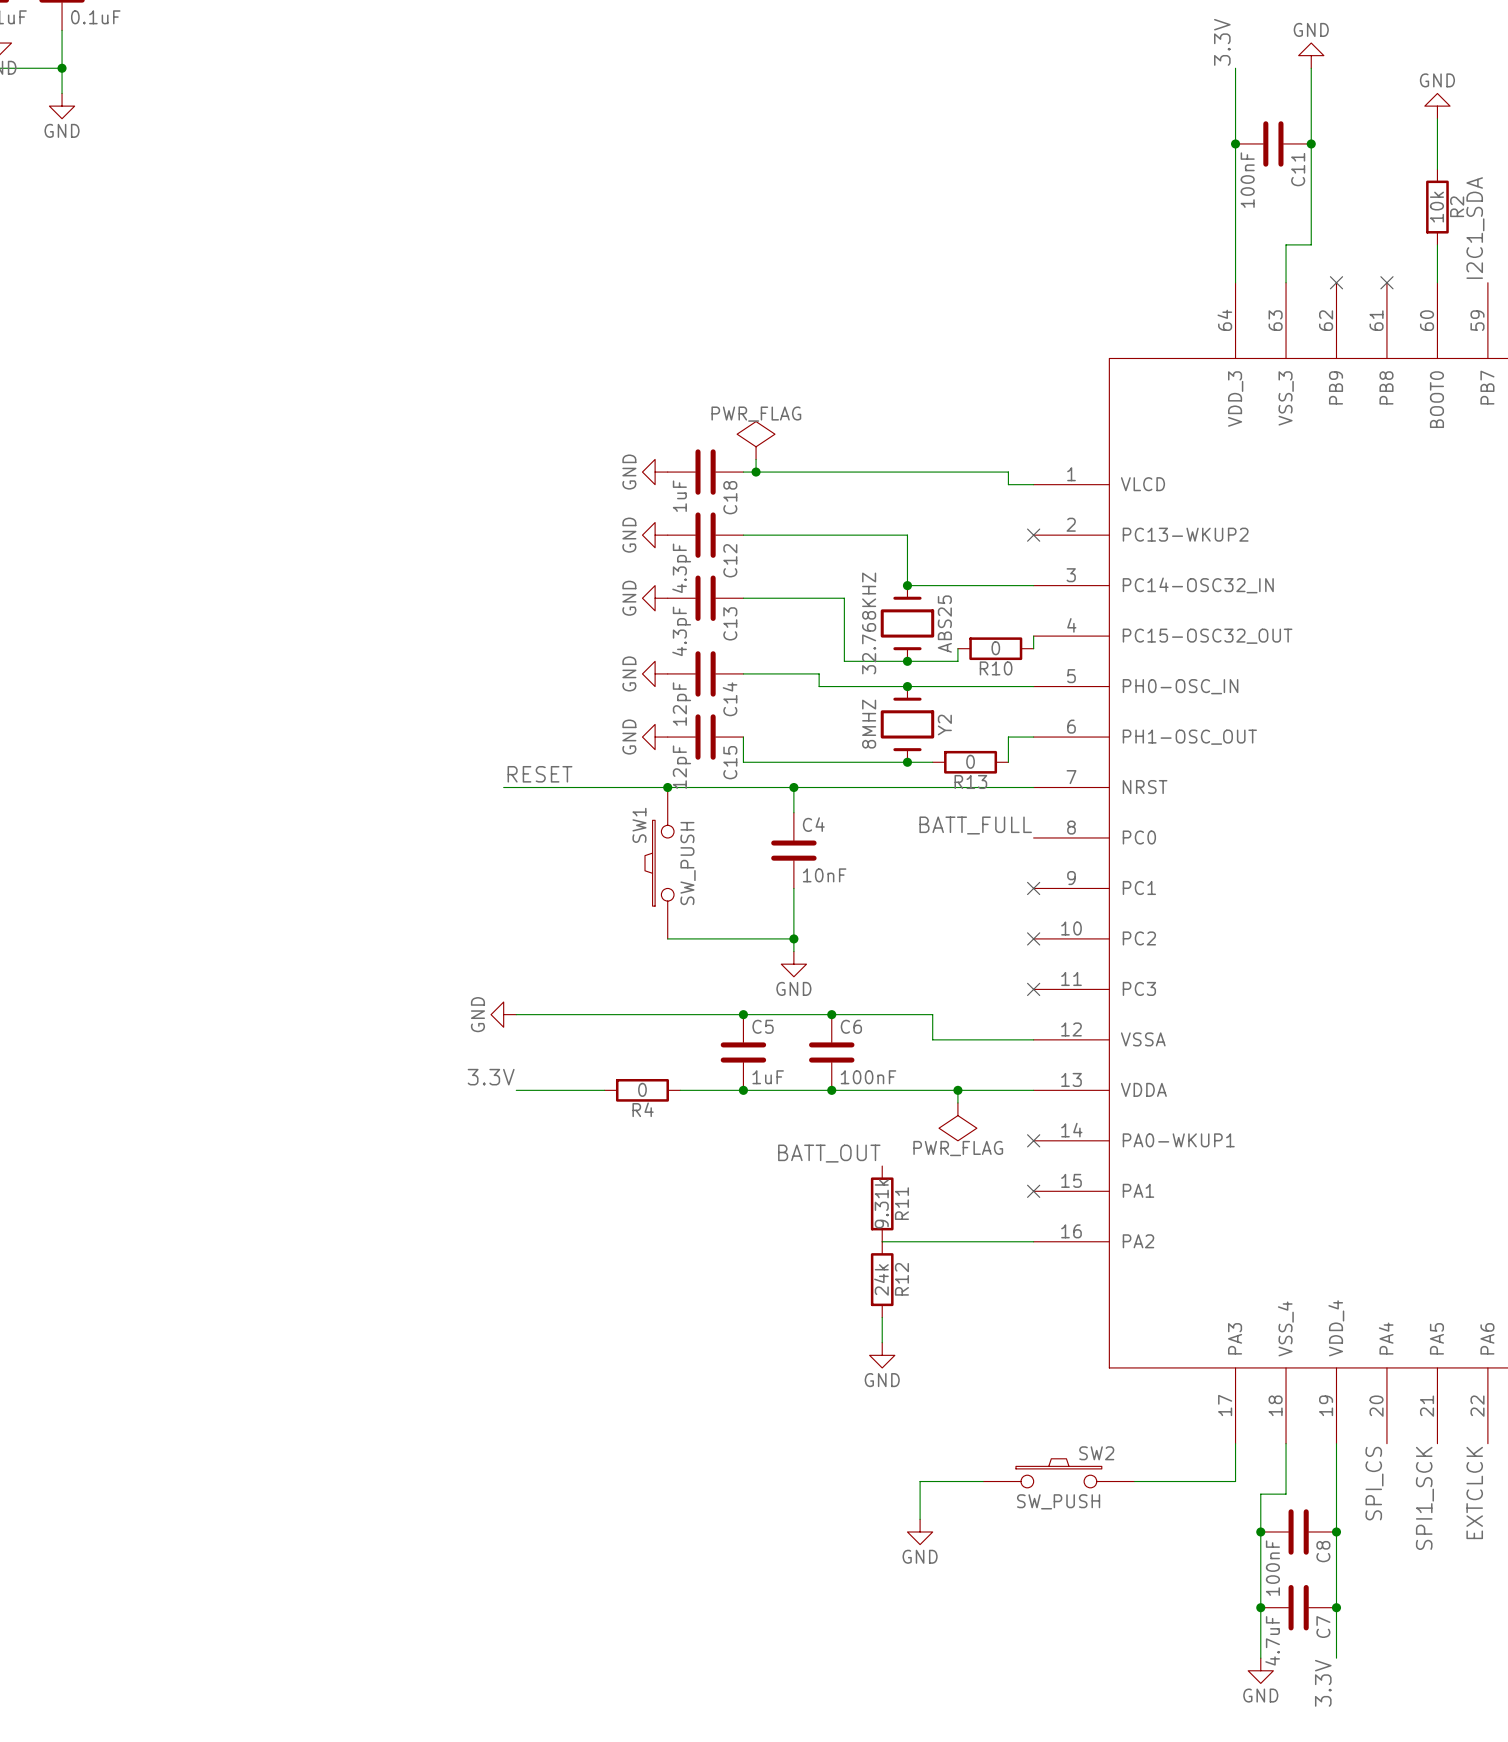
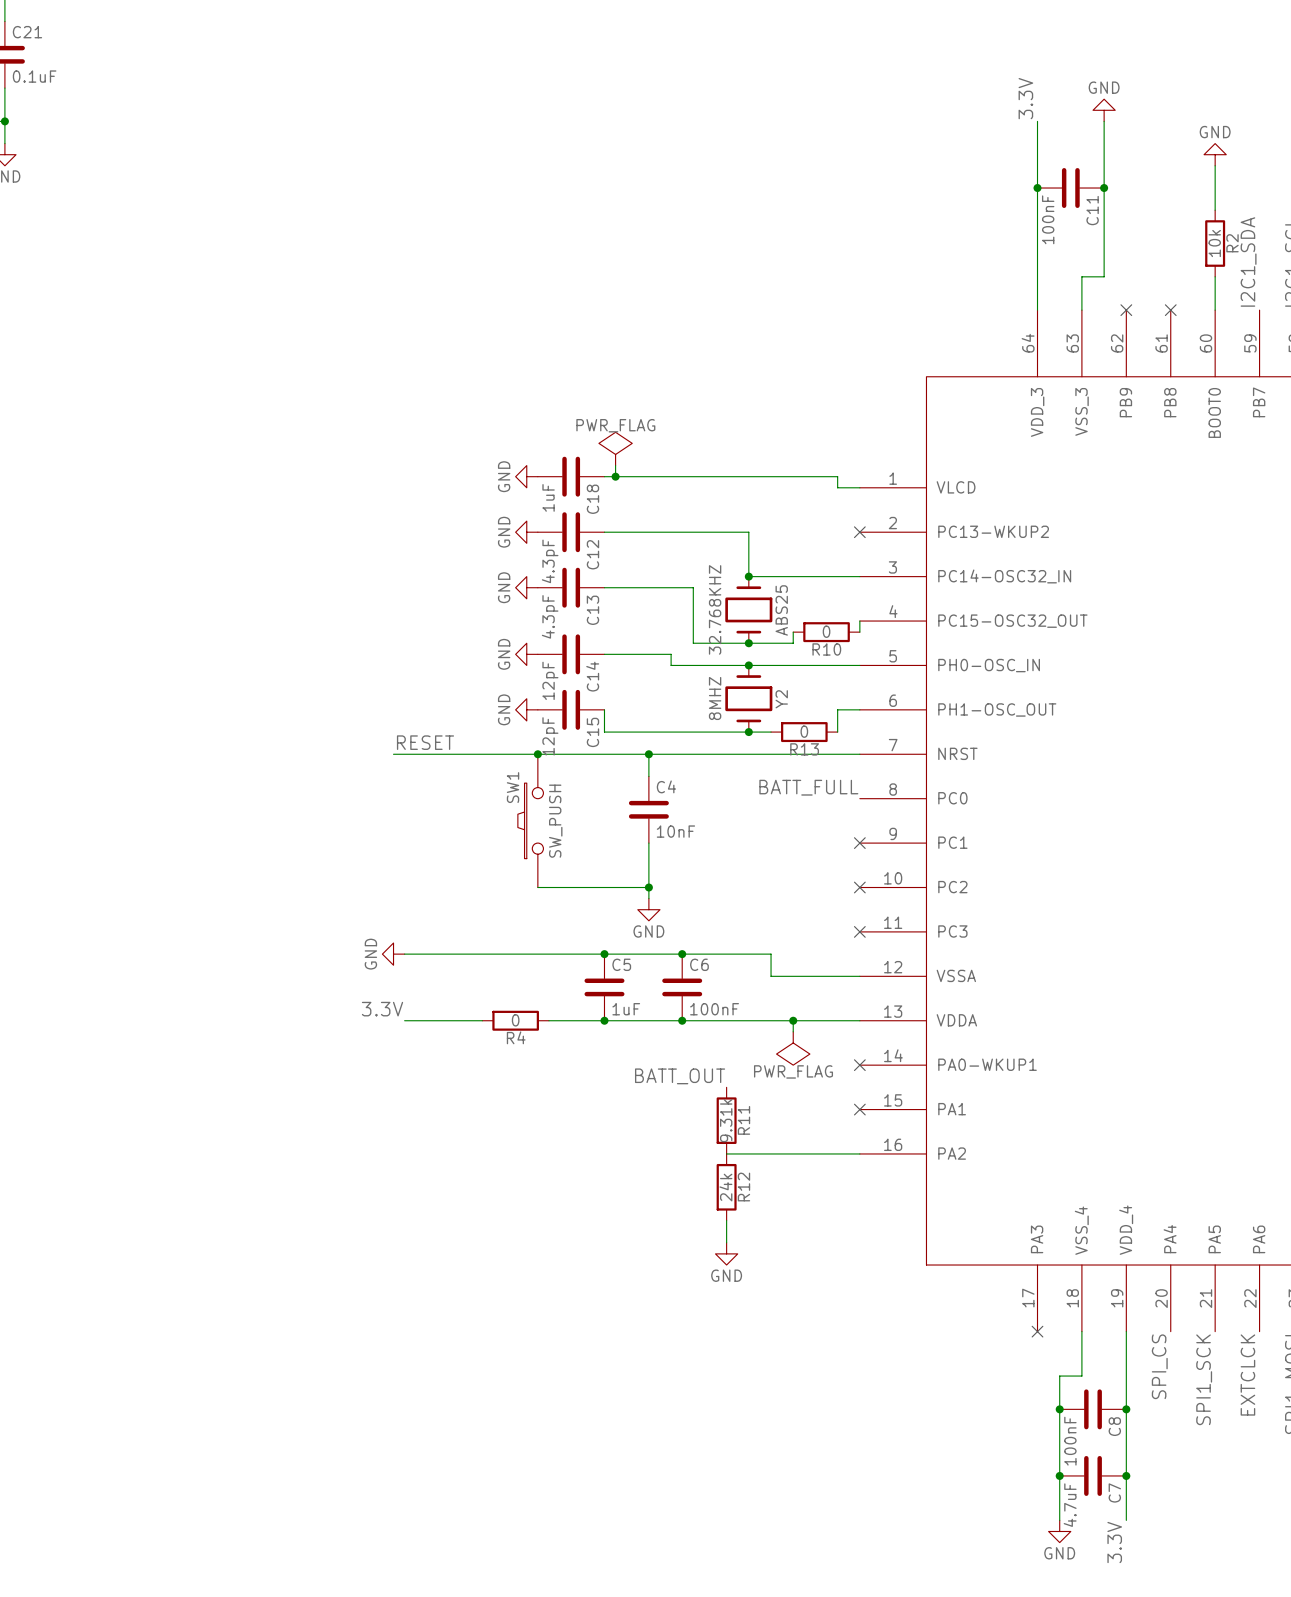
wire: (1235, 1443) (1235, 1481) (1134, 1481) -> none
no-connect mark: none -> (1037, 1331)
SW2: SW_PUSH (1058, 1473) -> none
wire: (983, 1481) (920, 1481) (920, 1519) -> none
power symbol: GND (920, 1531) -> none

